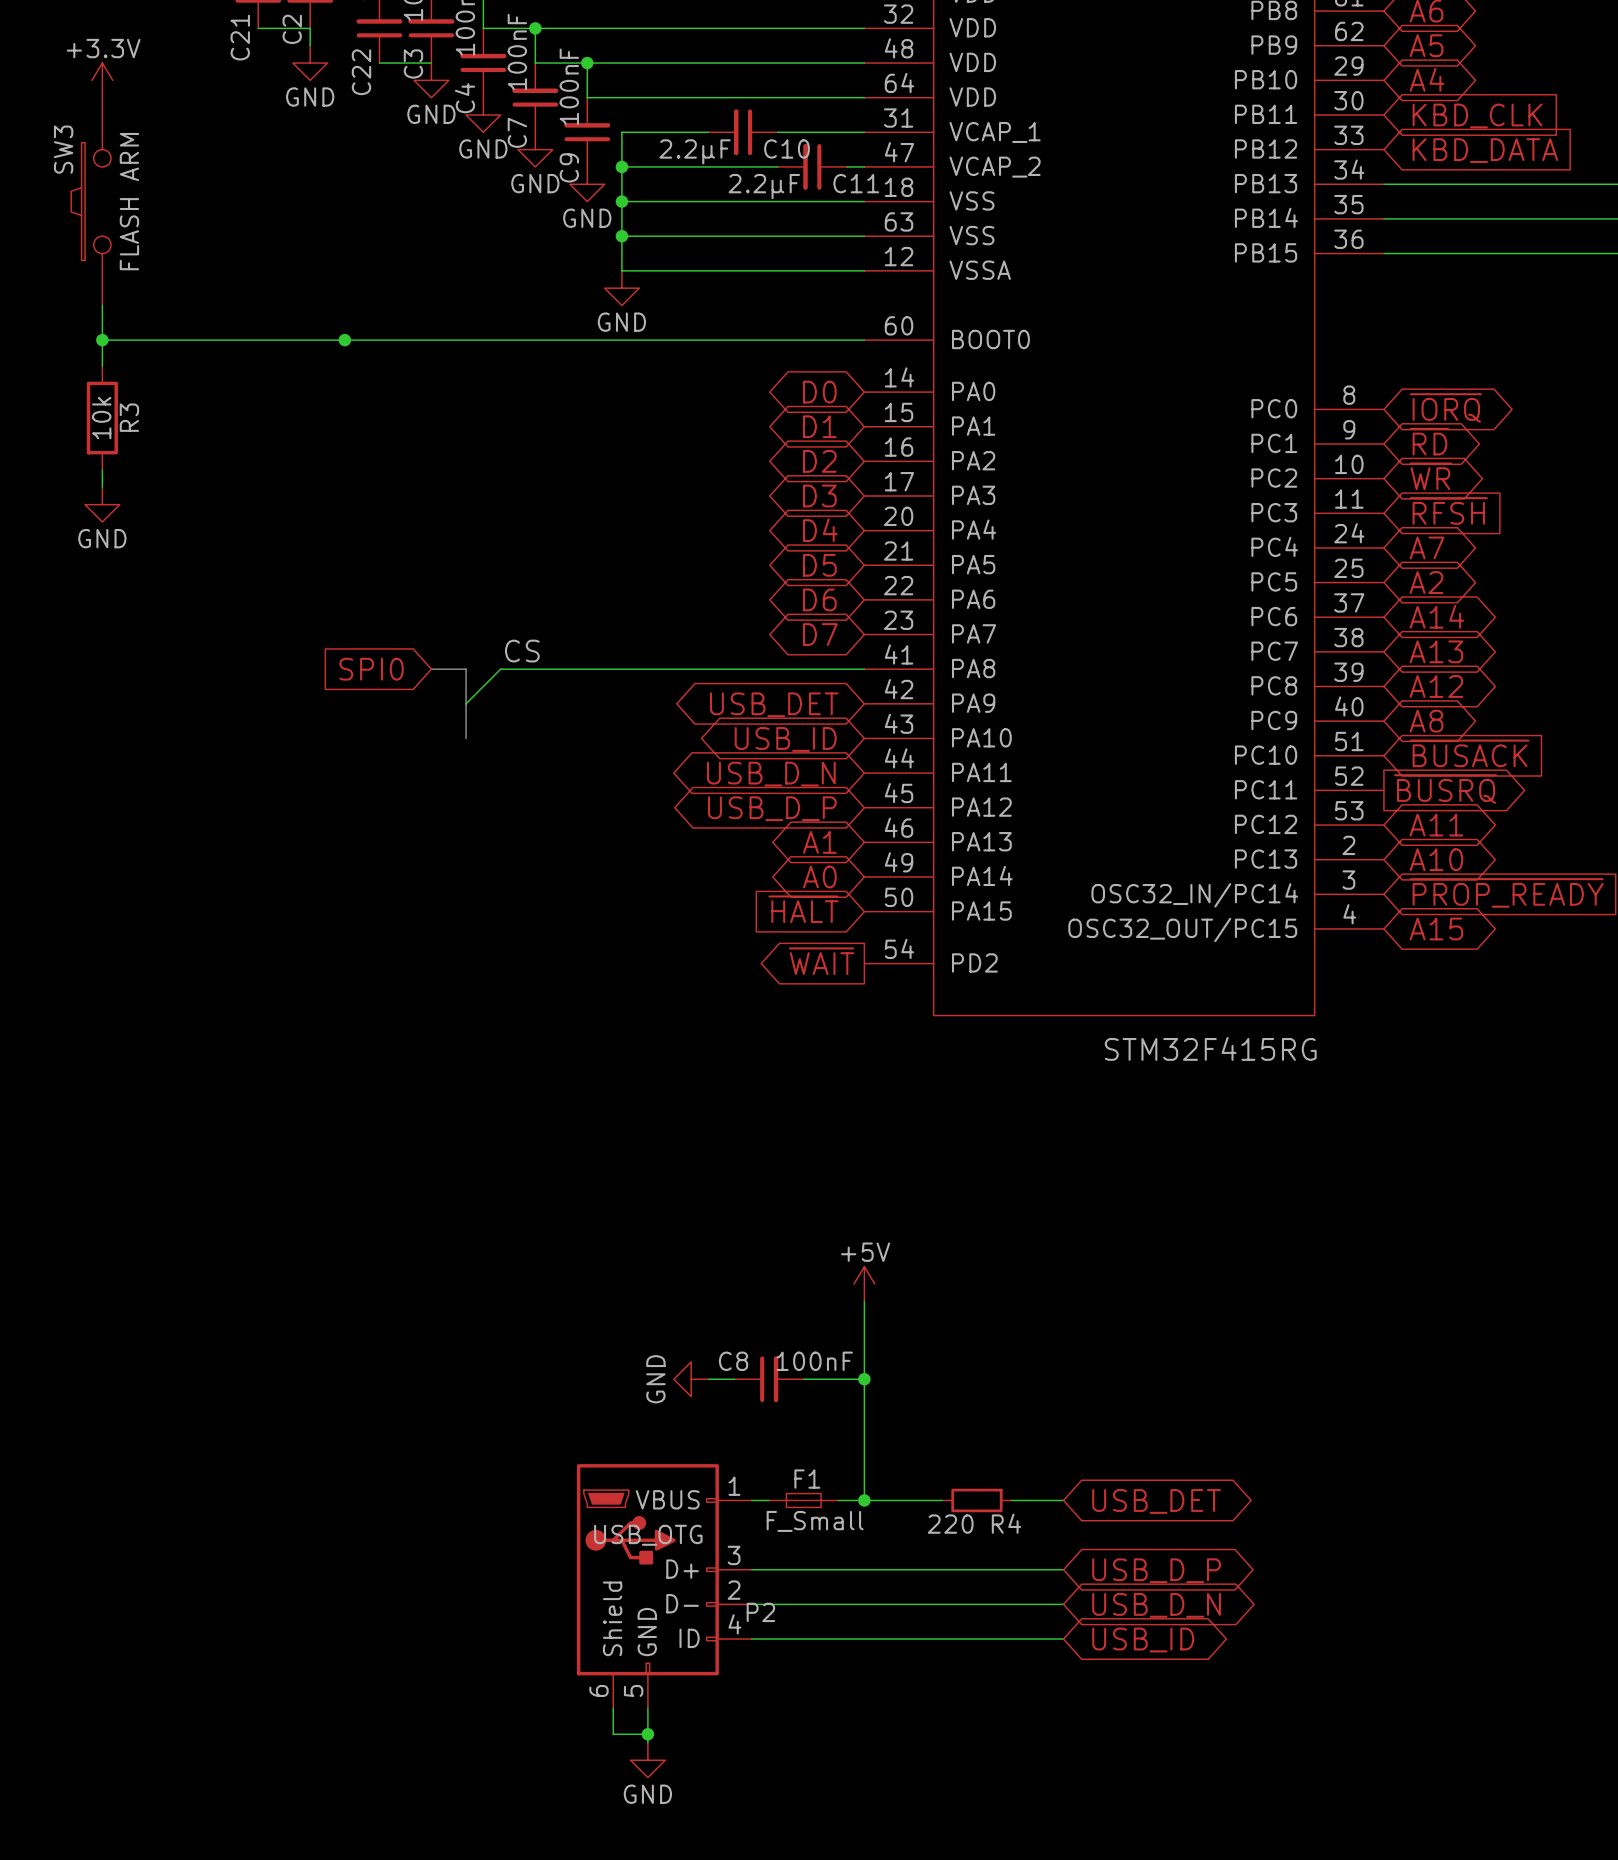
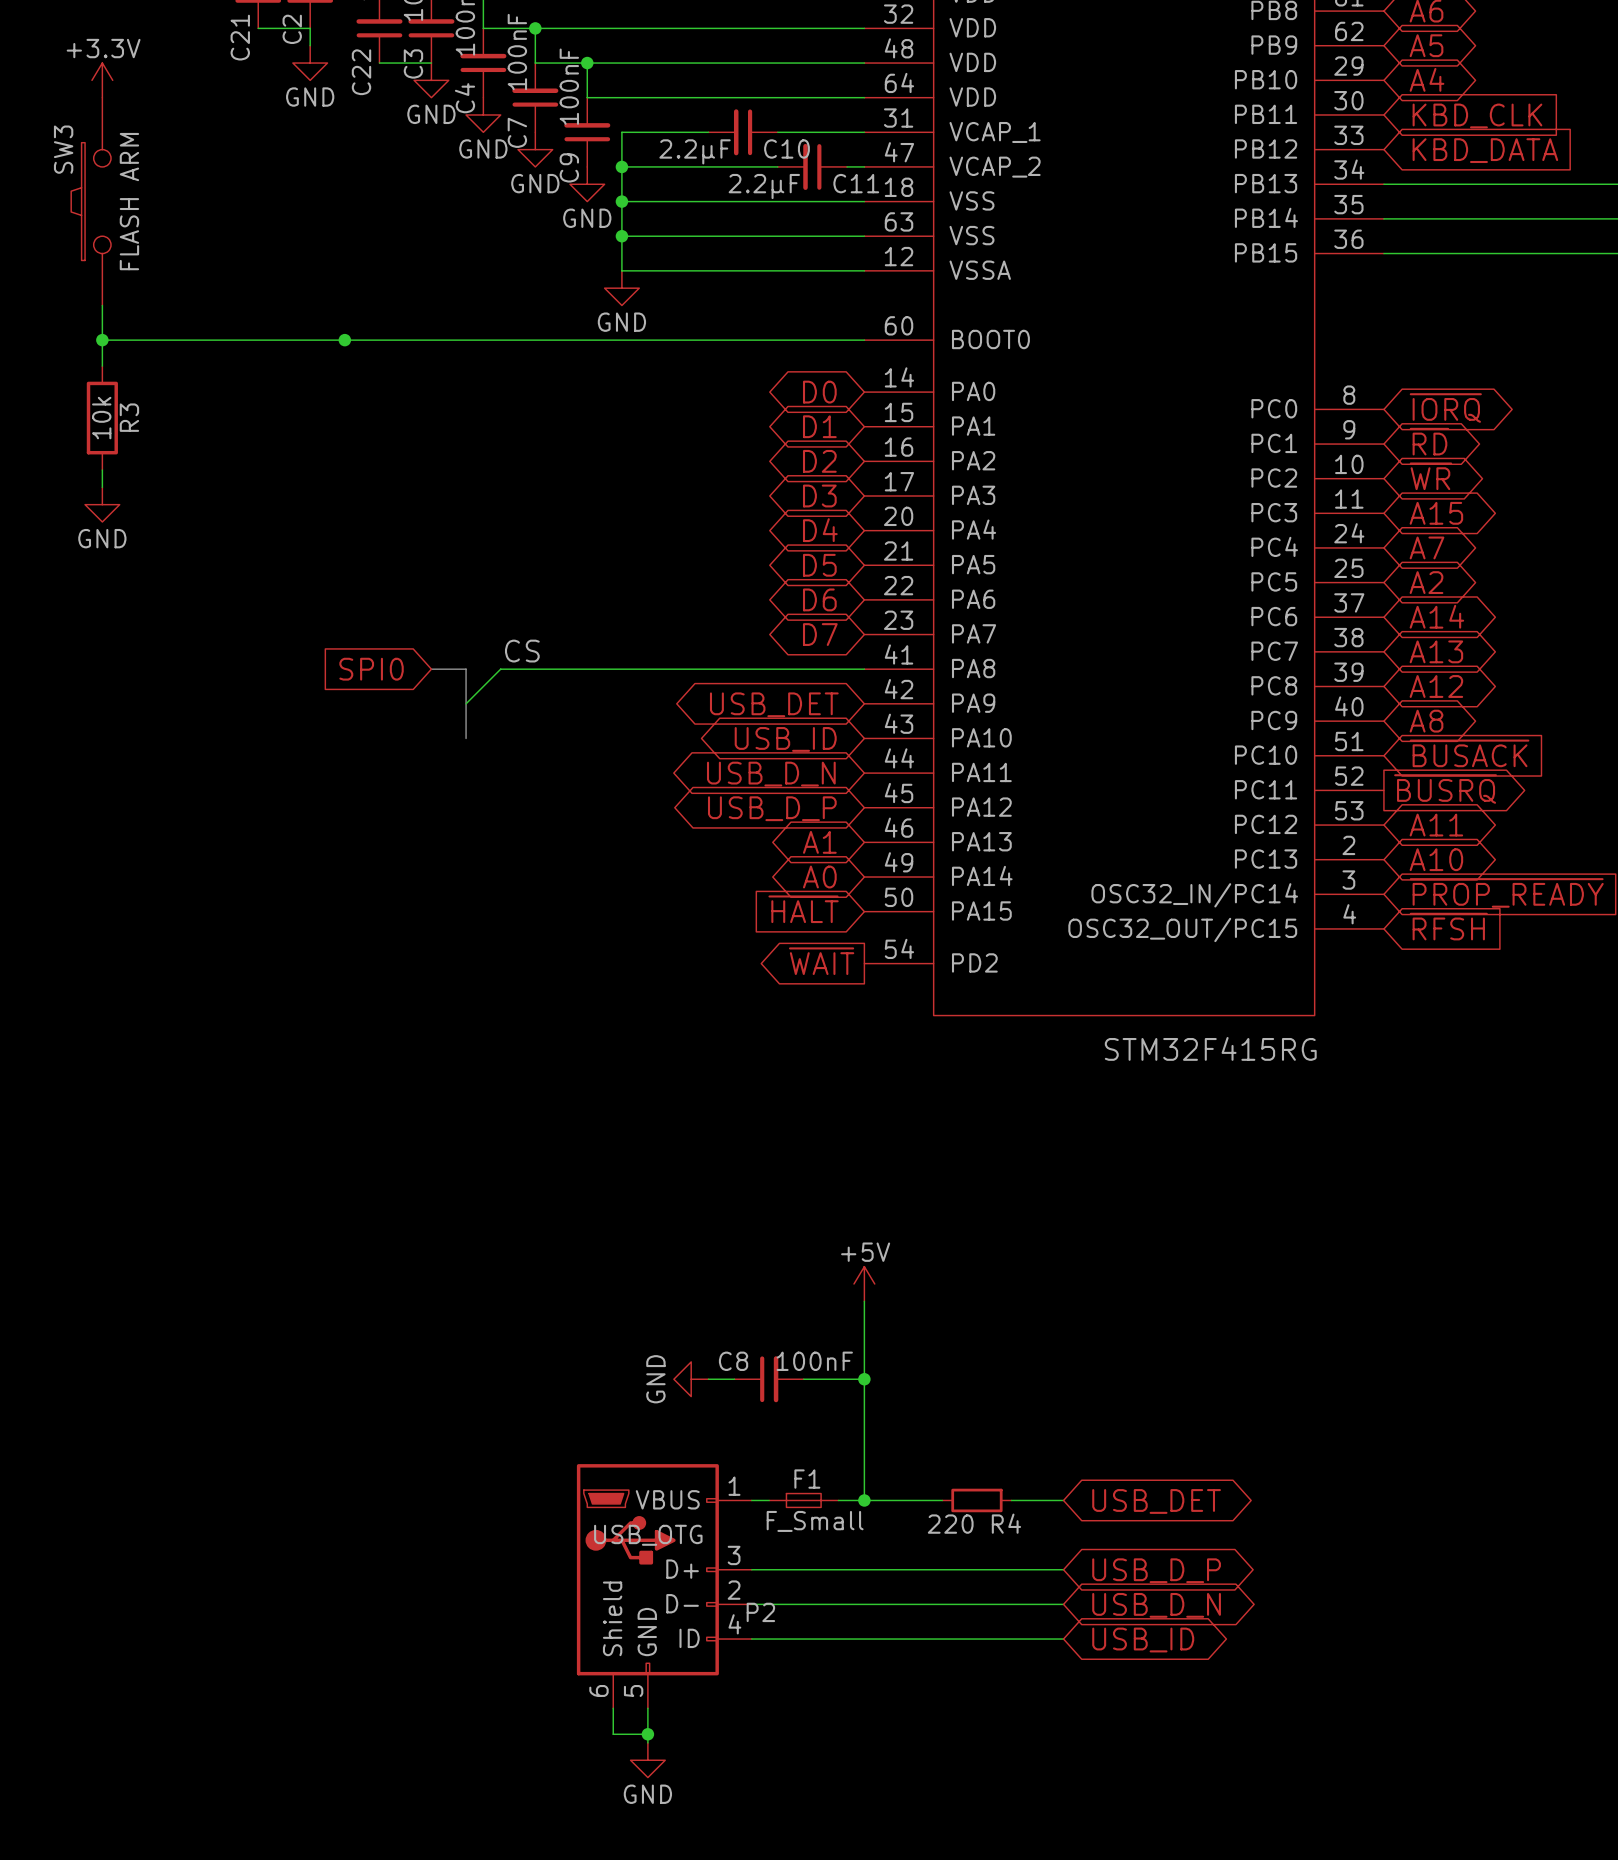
global label shape: input (1448, 510) -> bidirectional (1436, 513)
global label: ~{RFSH} (1448, 510) -> A15 (1436, 513)
global label shape: bidirectional (1436, 928) -> input (1448, 926)
global label: A15 (1436, 928) -> ~{RFSH} (1448, 926)

